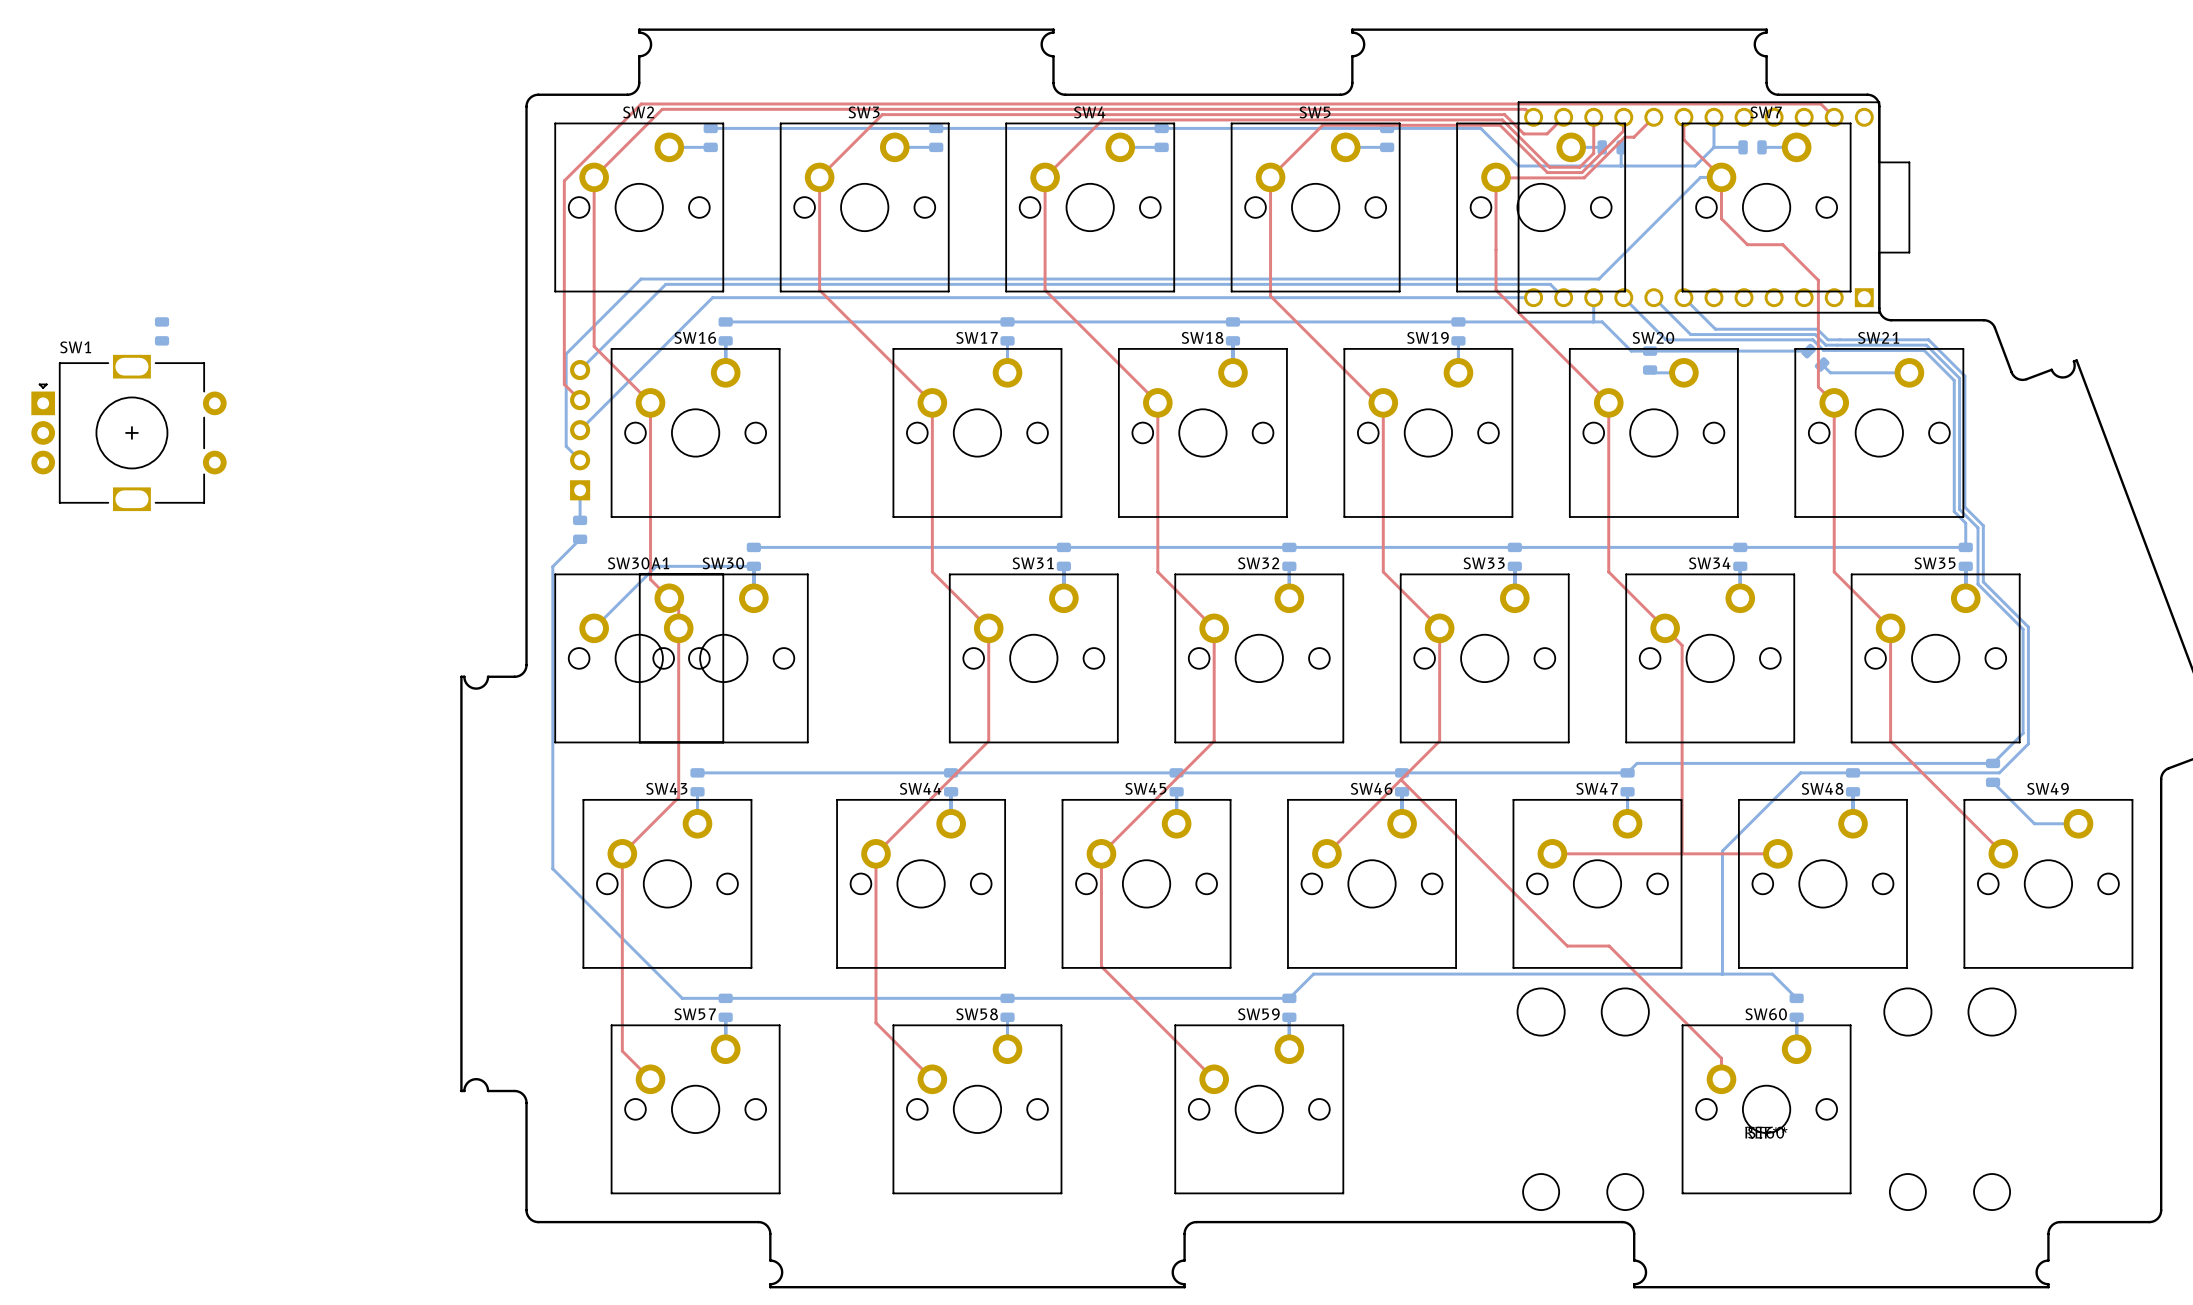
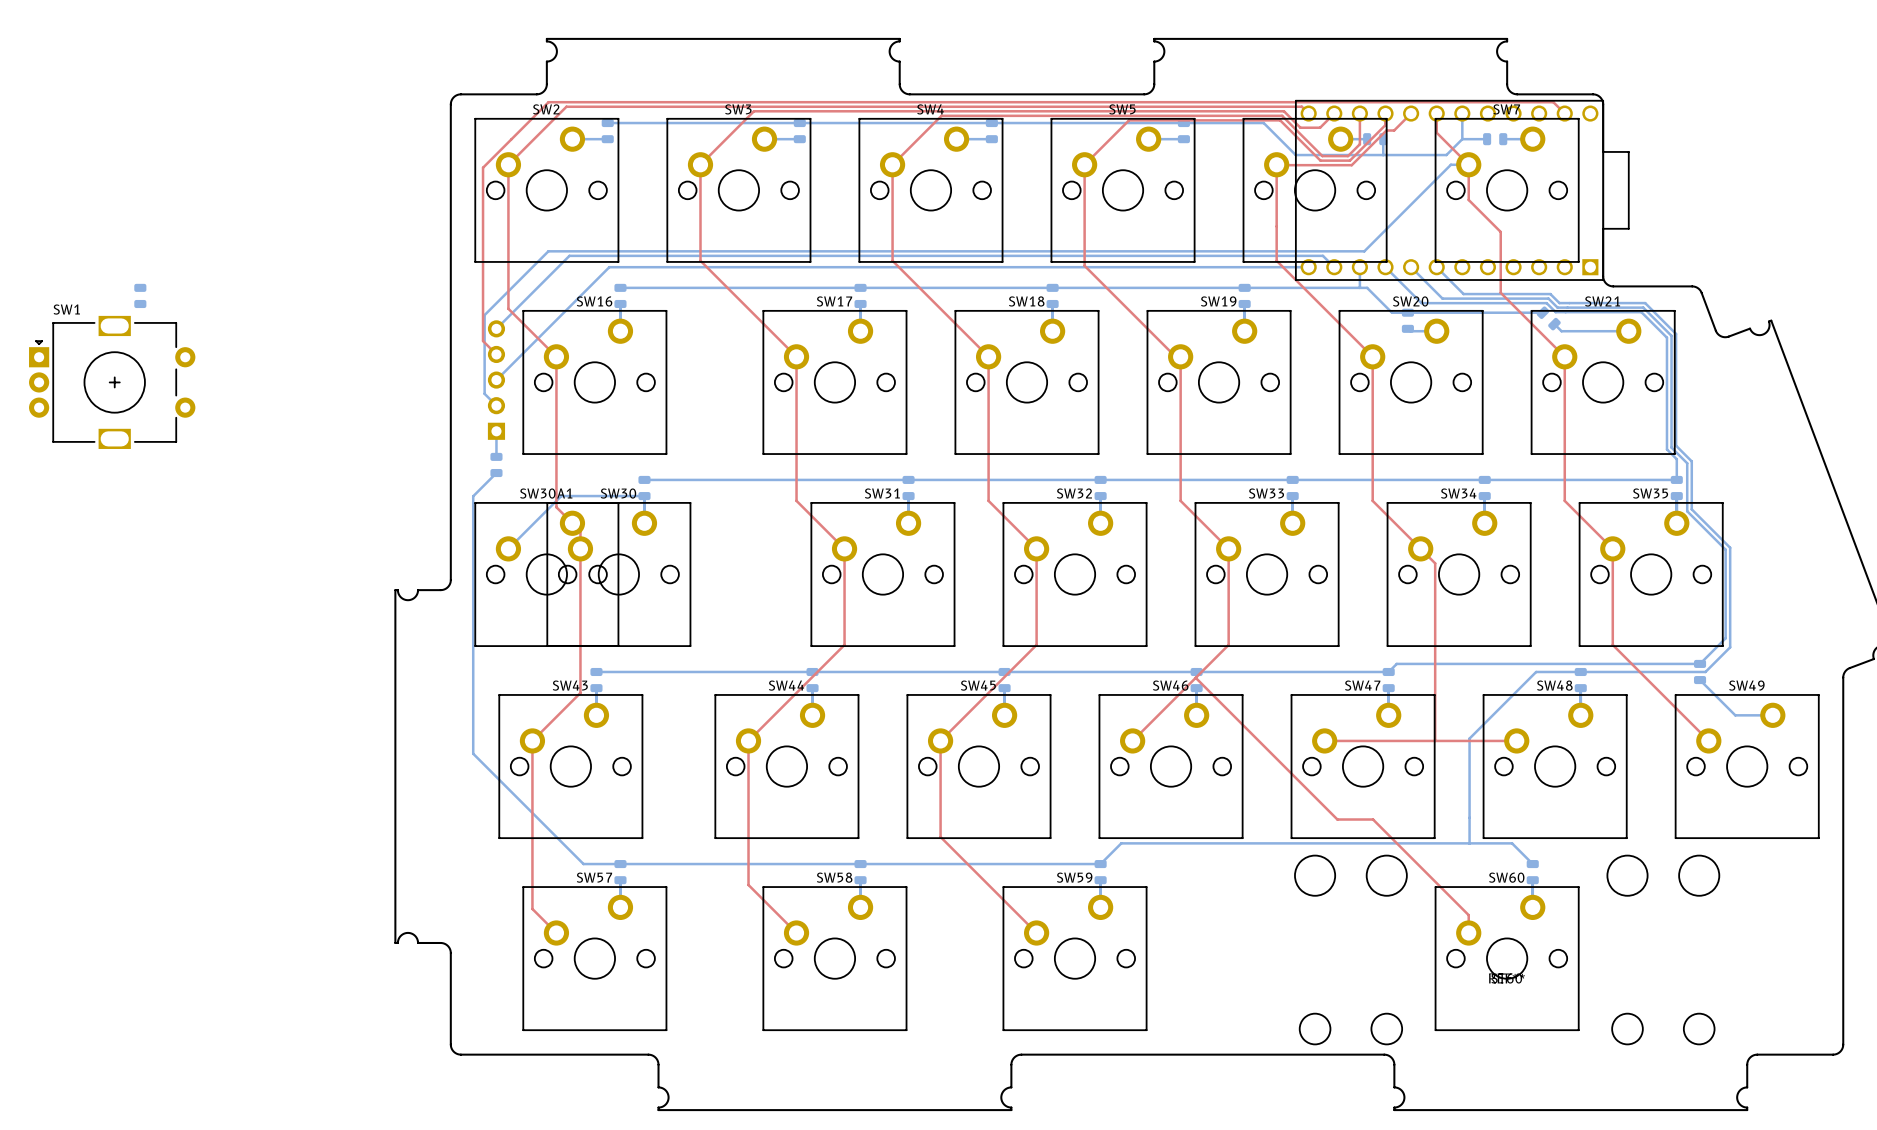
top track: (1747, 244) (1782, 244) (1818, 280) (1818, 387) -> (1490, 222) (1500, 231) (1500, 292) (1551, 343)

